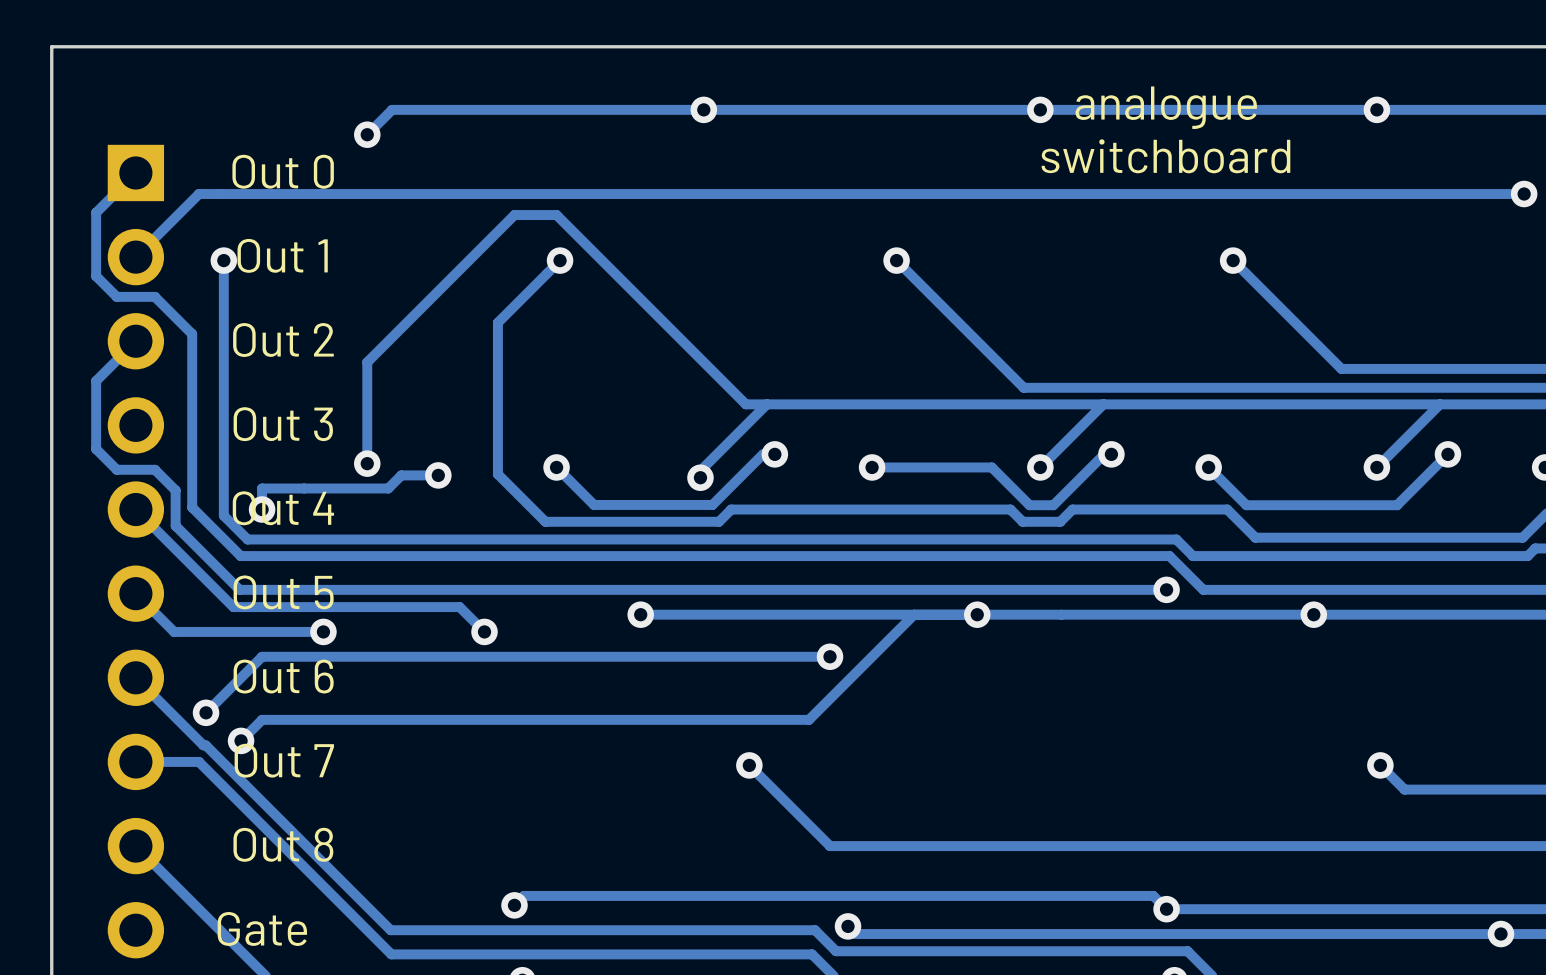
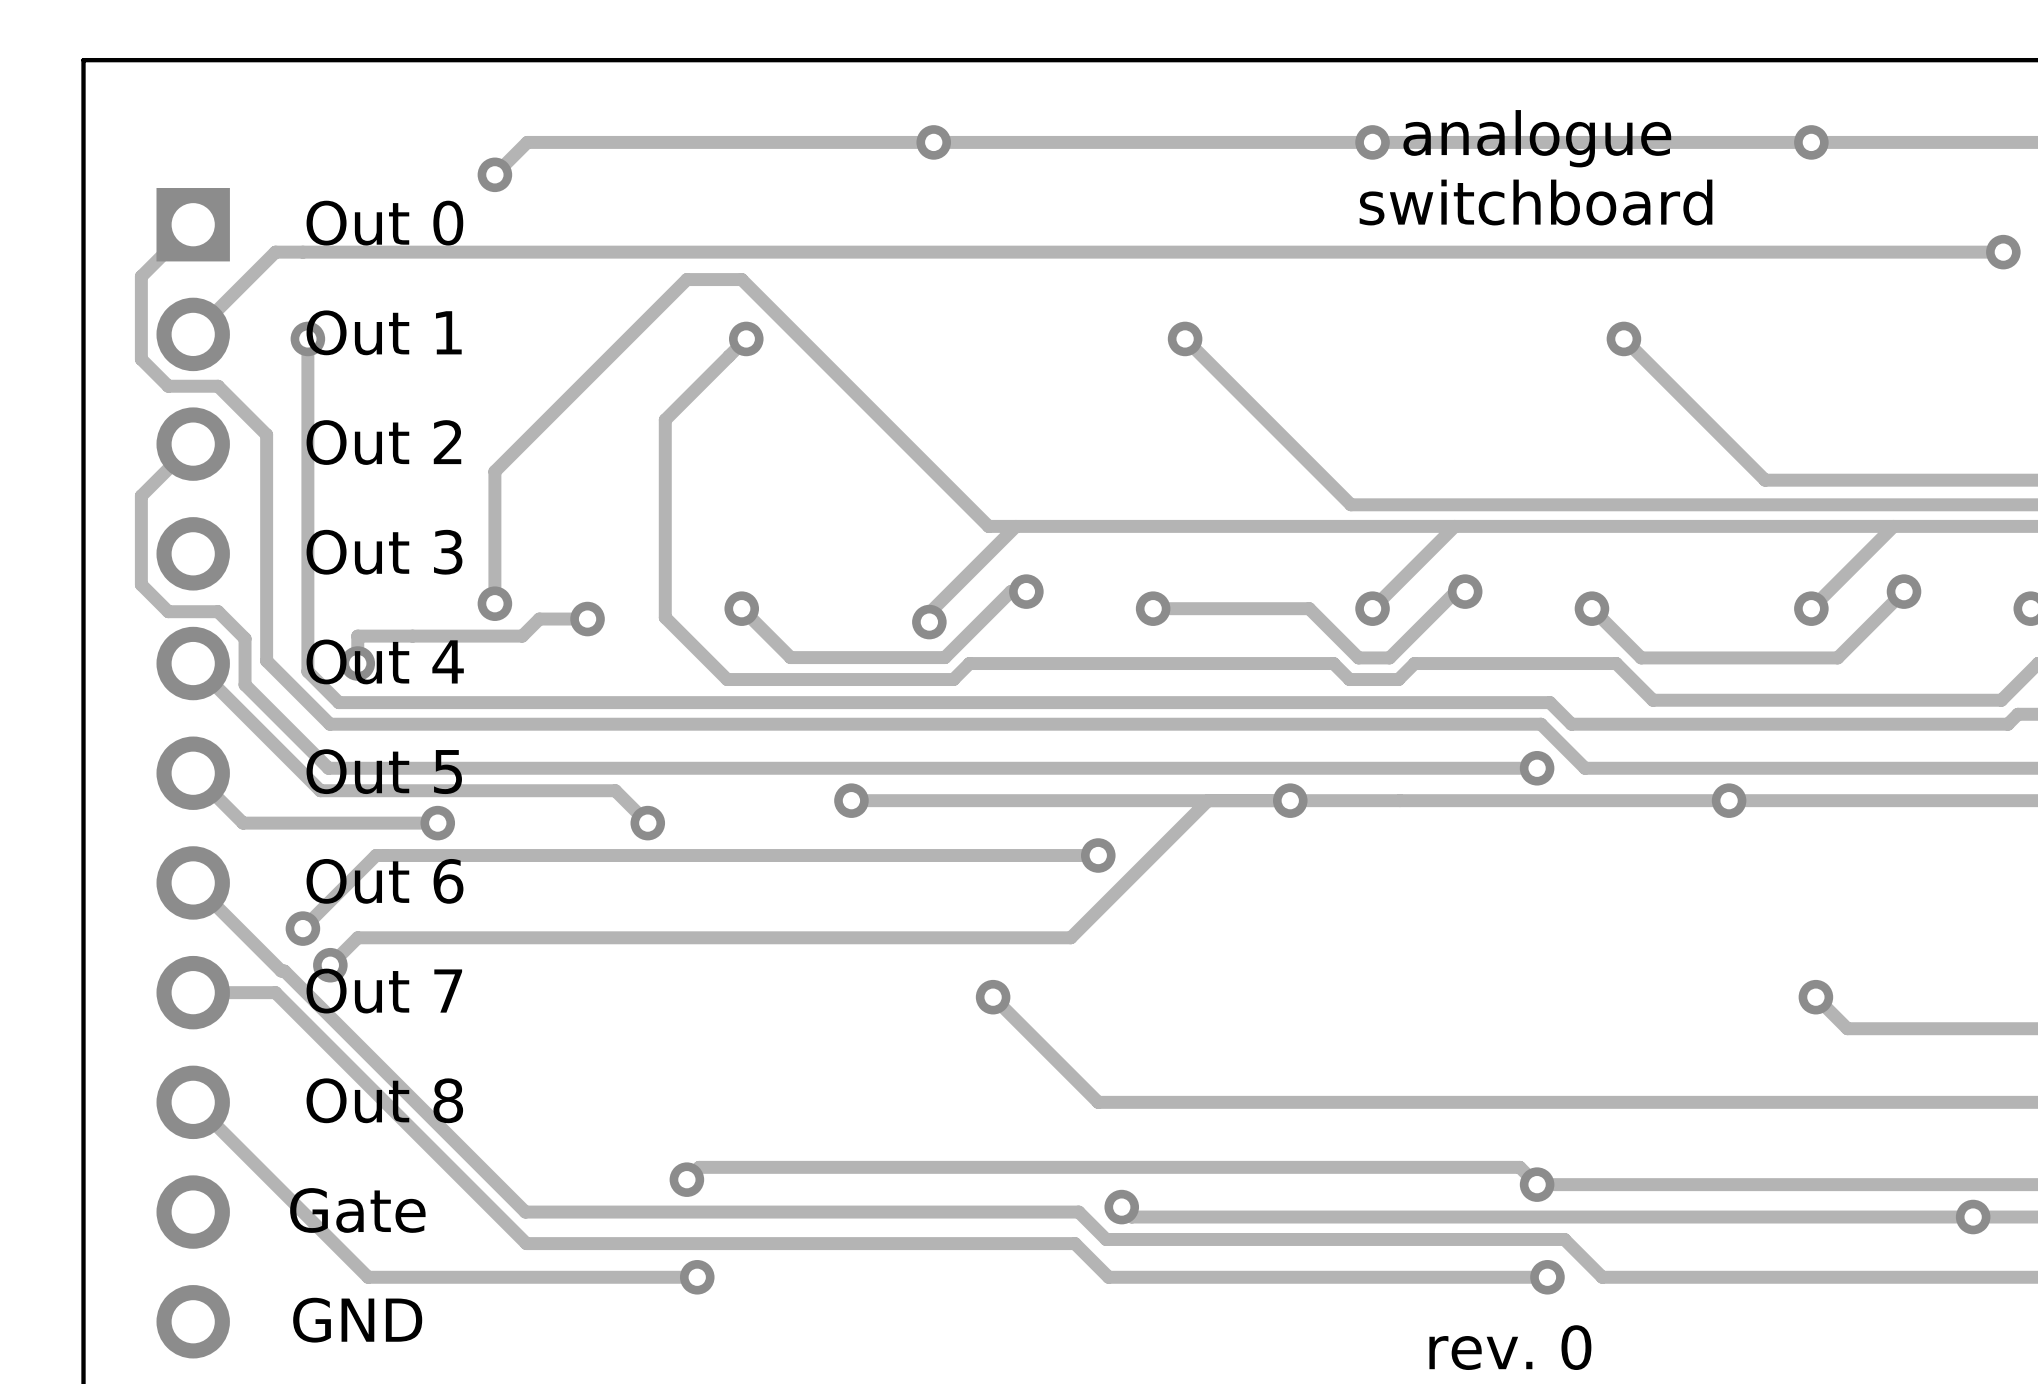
track: (276, 656) (262, 656) (206, 712) -> (376, 855) (302, 928)
via position: (206, 712) -> (302, 928)

